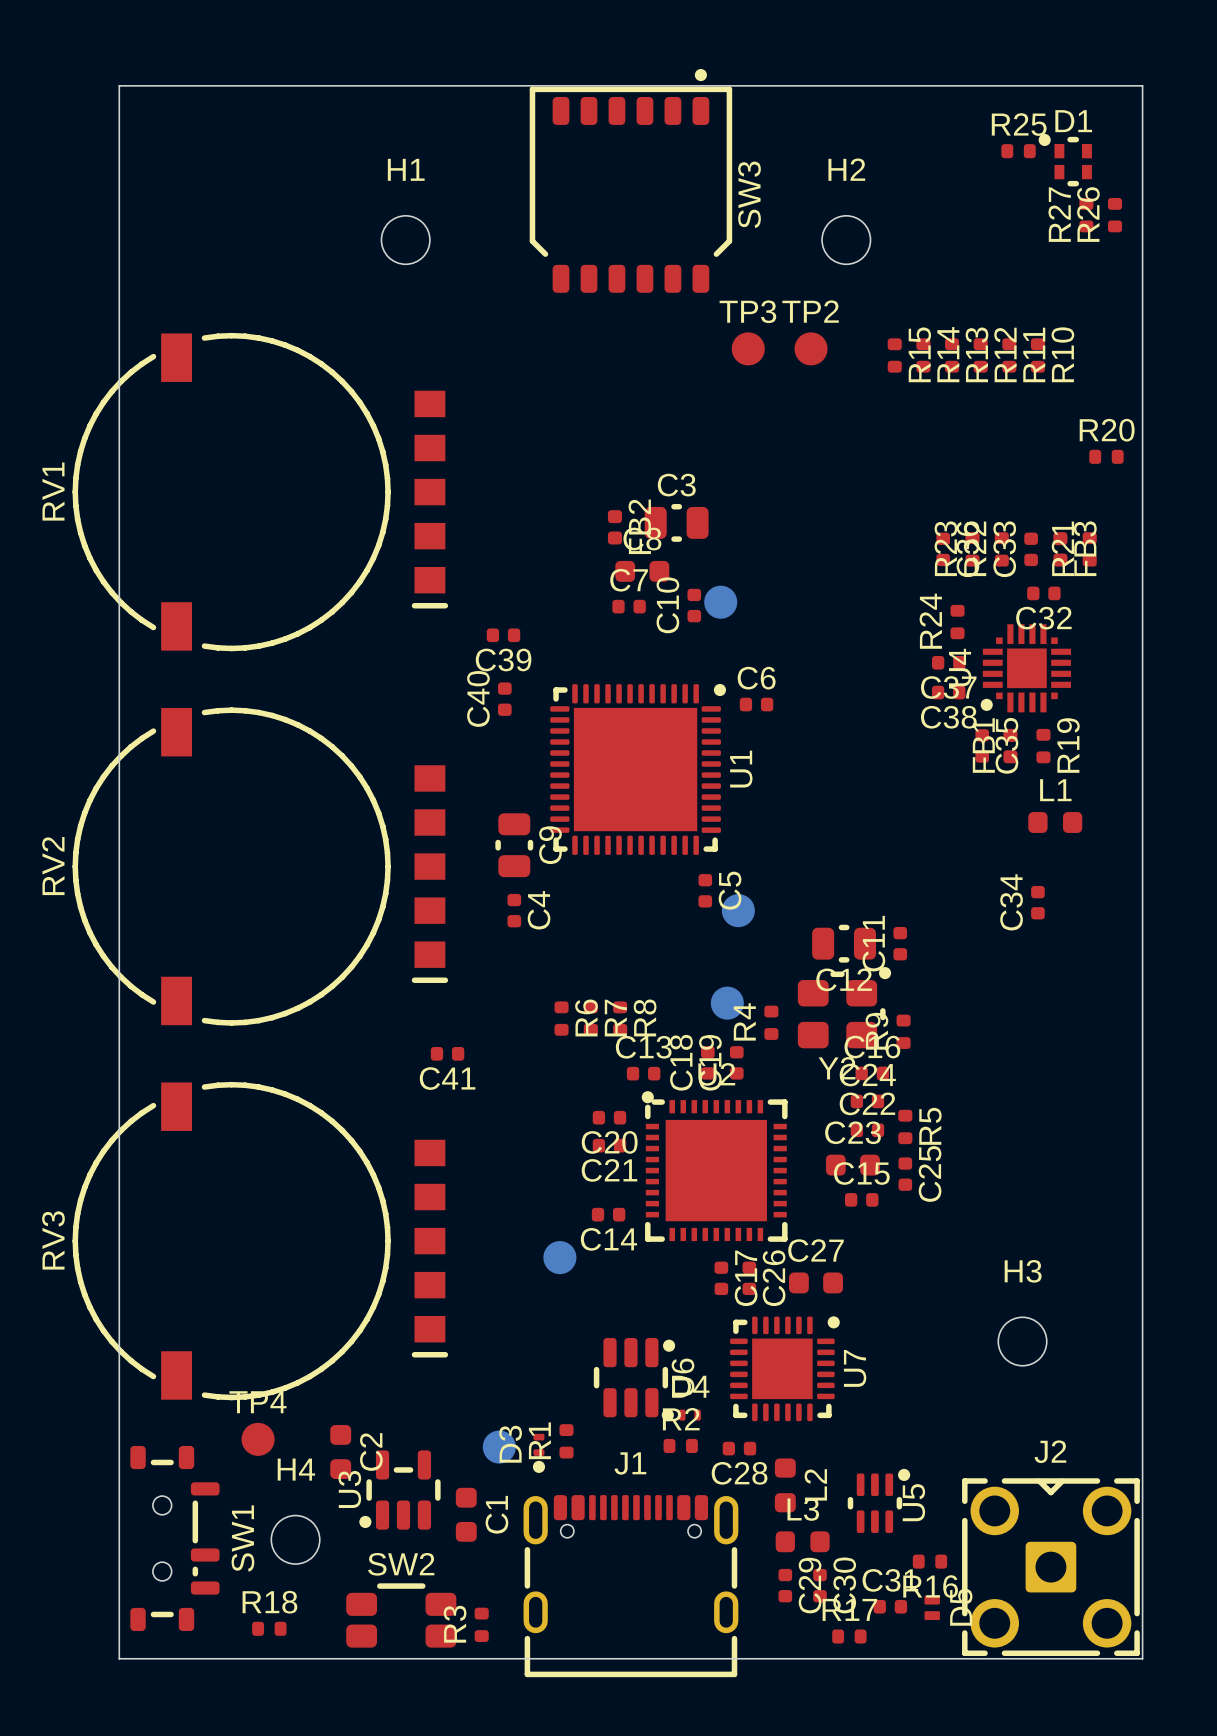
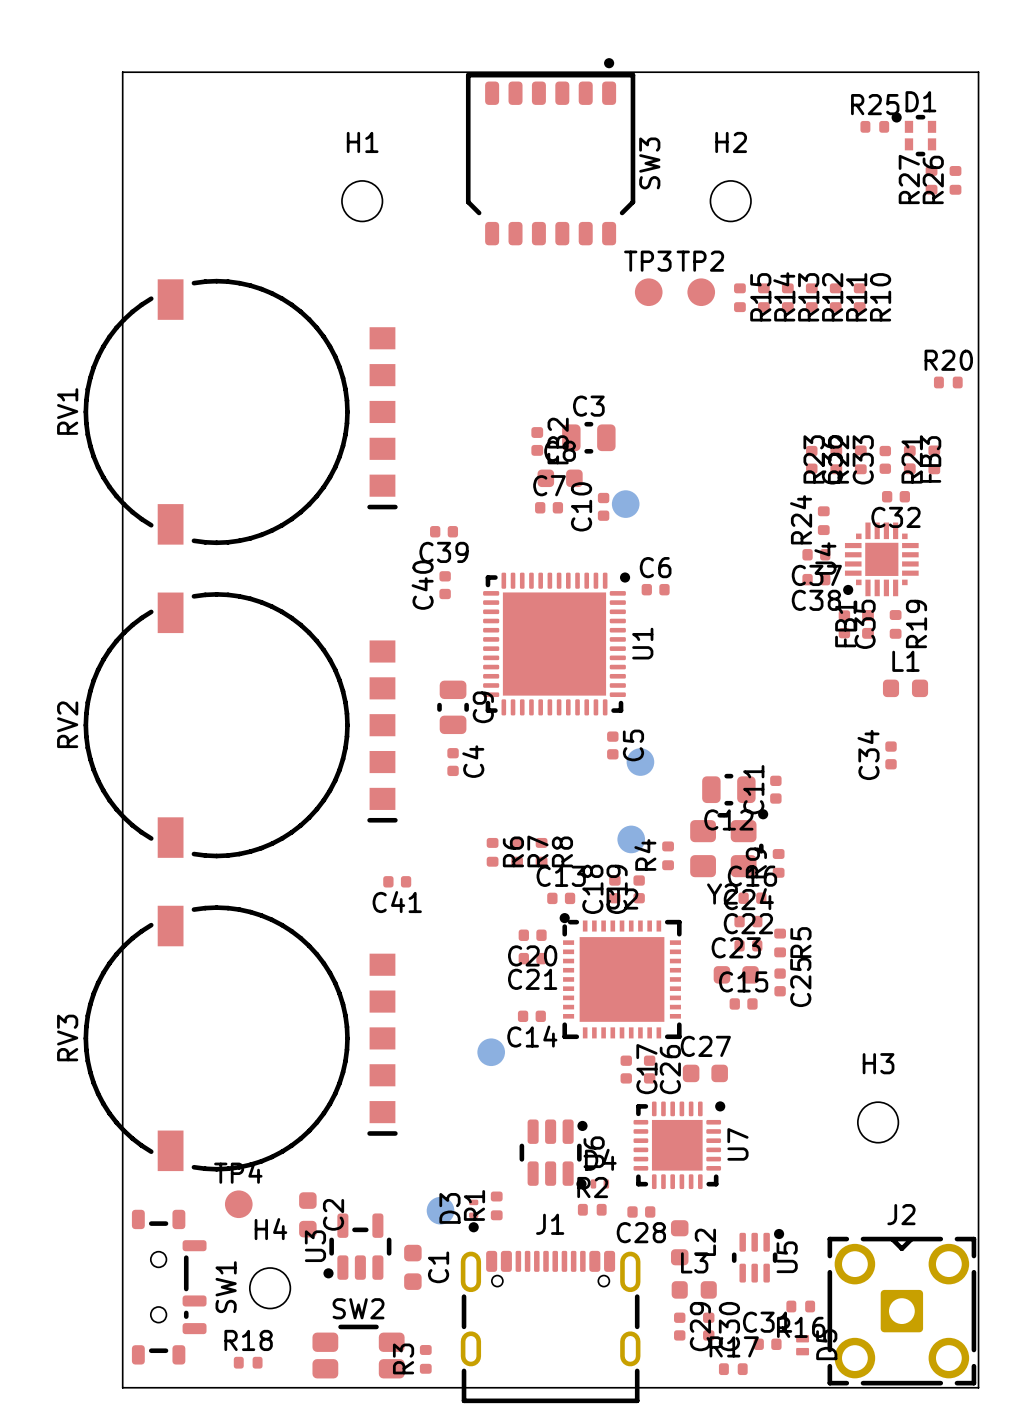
R15 position: (894, 355) -> (739, 297)
R14 position: (923, 355) -> (763, 297)
R13 position: (952, 355) -> (787, 297)
R12 position: (980, 355) -> (811, 297)
R11 position: (1009, 355) -> (835, 297)
R10 position: (1037, 355) -> (859, 297)

